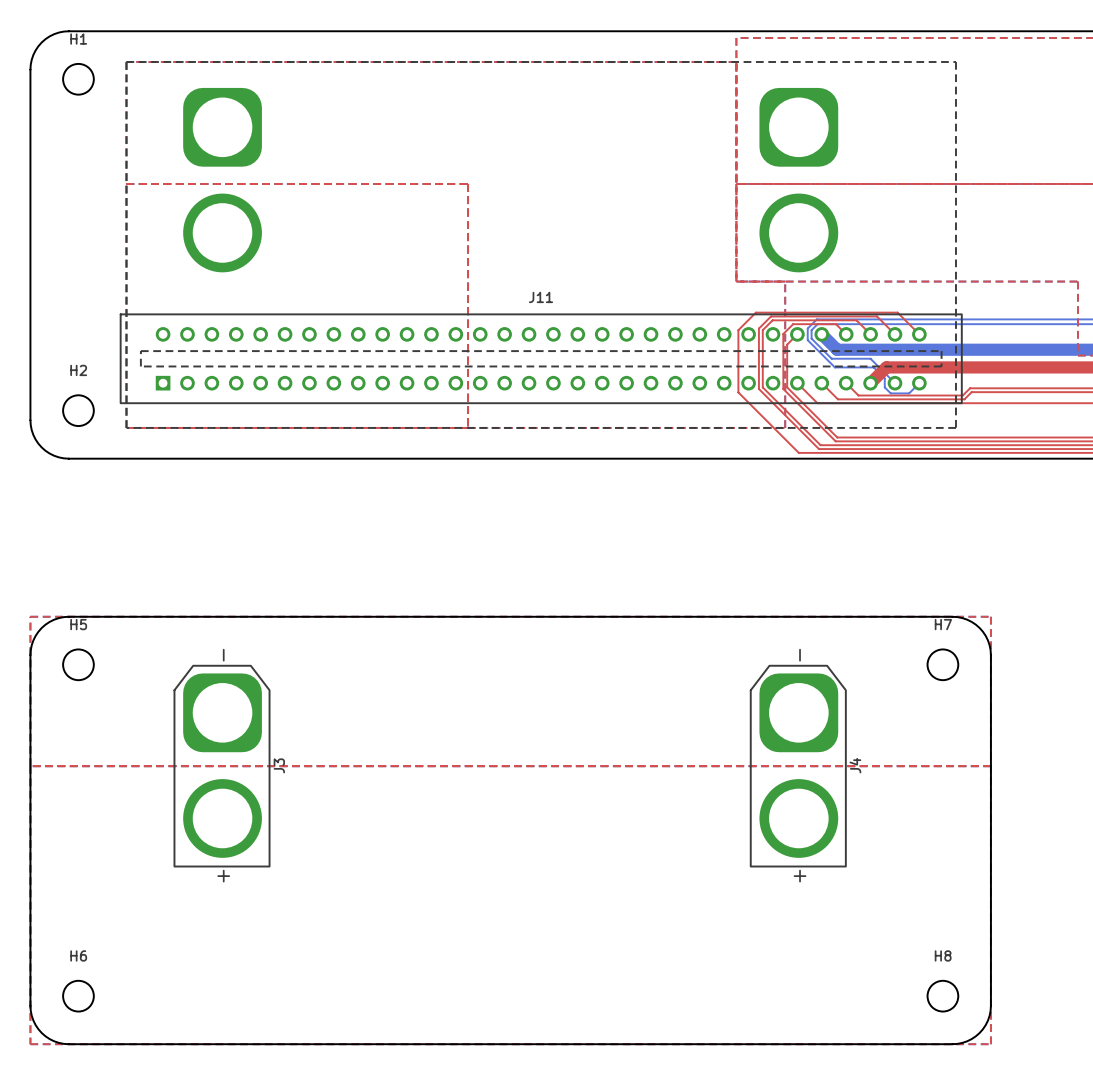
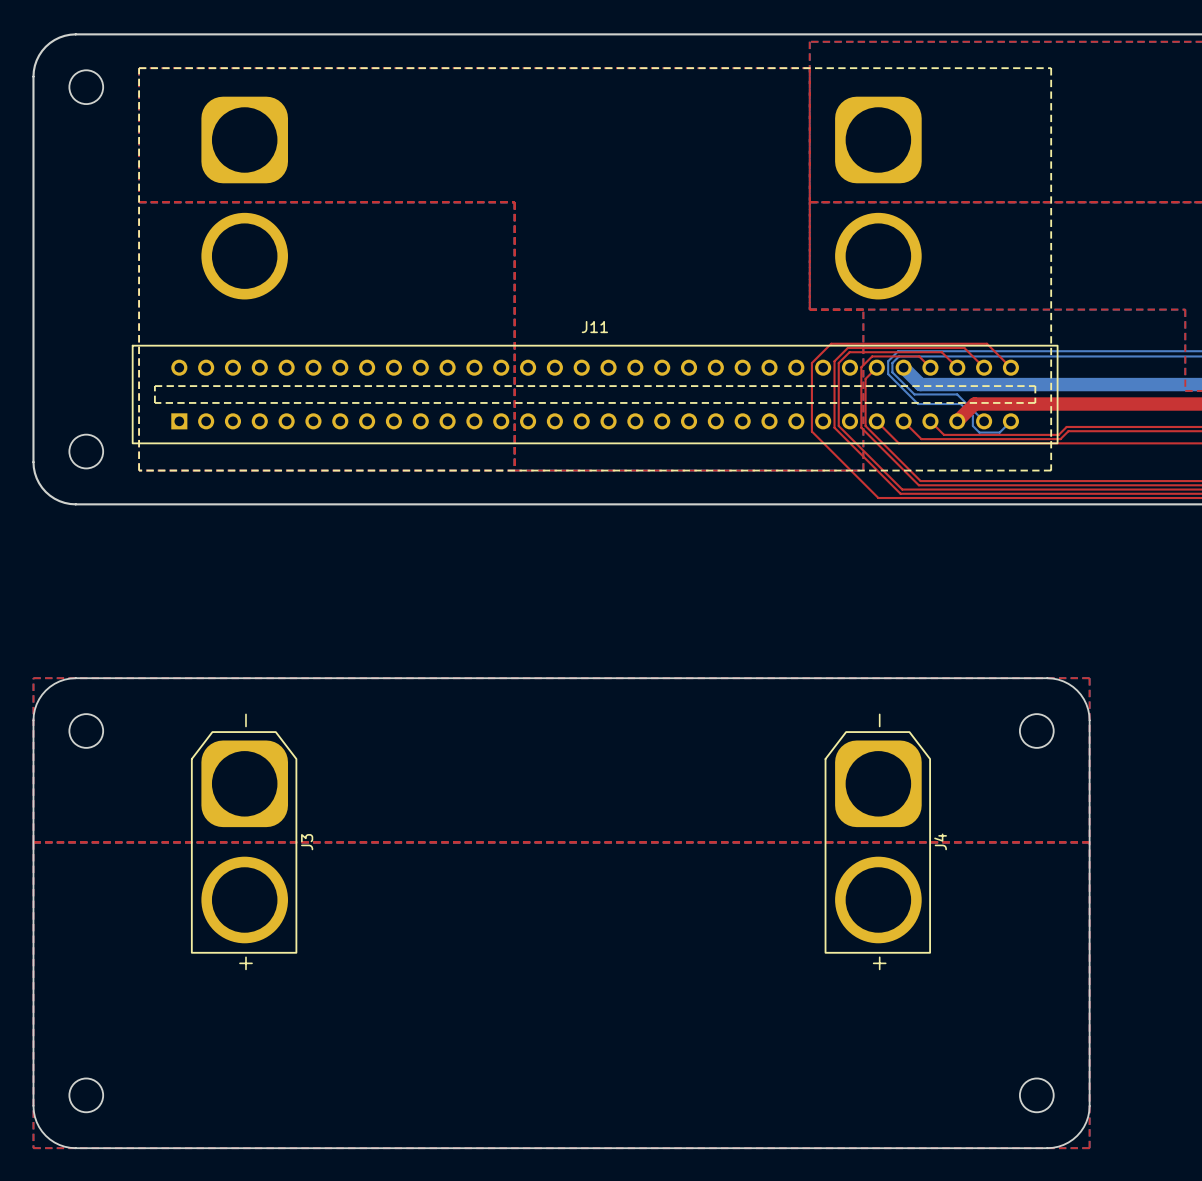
H1 name: H1 (78, 39) -> none
H2 name: H2 (78, 370) -> none
H5 name: H5 (78, 624) -> none
H7 name: H7 (943, 624) -> none
H6 name: H6 (78, 955) -> none
H8 name: H8 (943, 955) -> none

